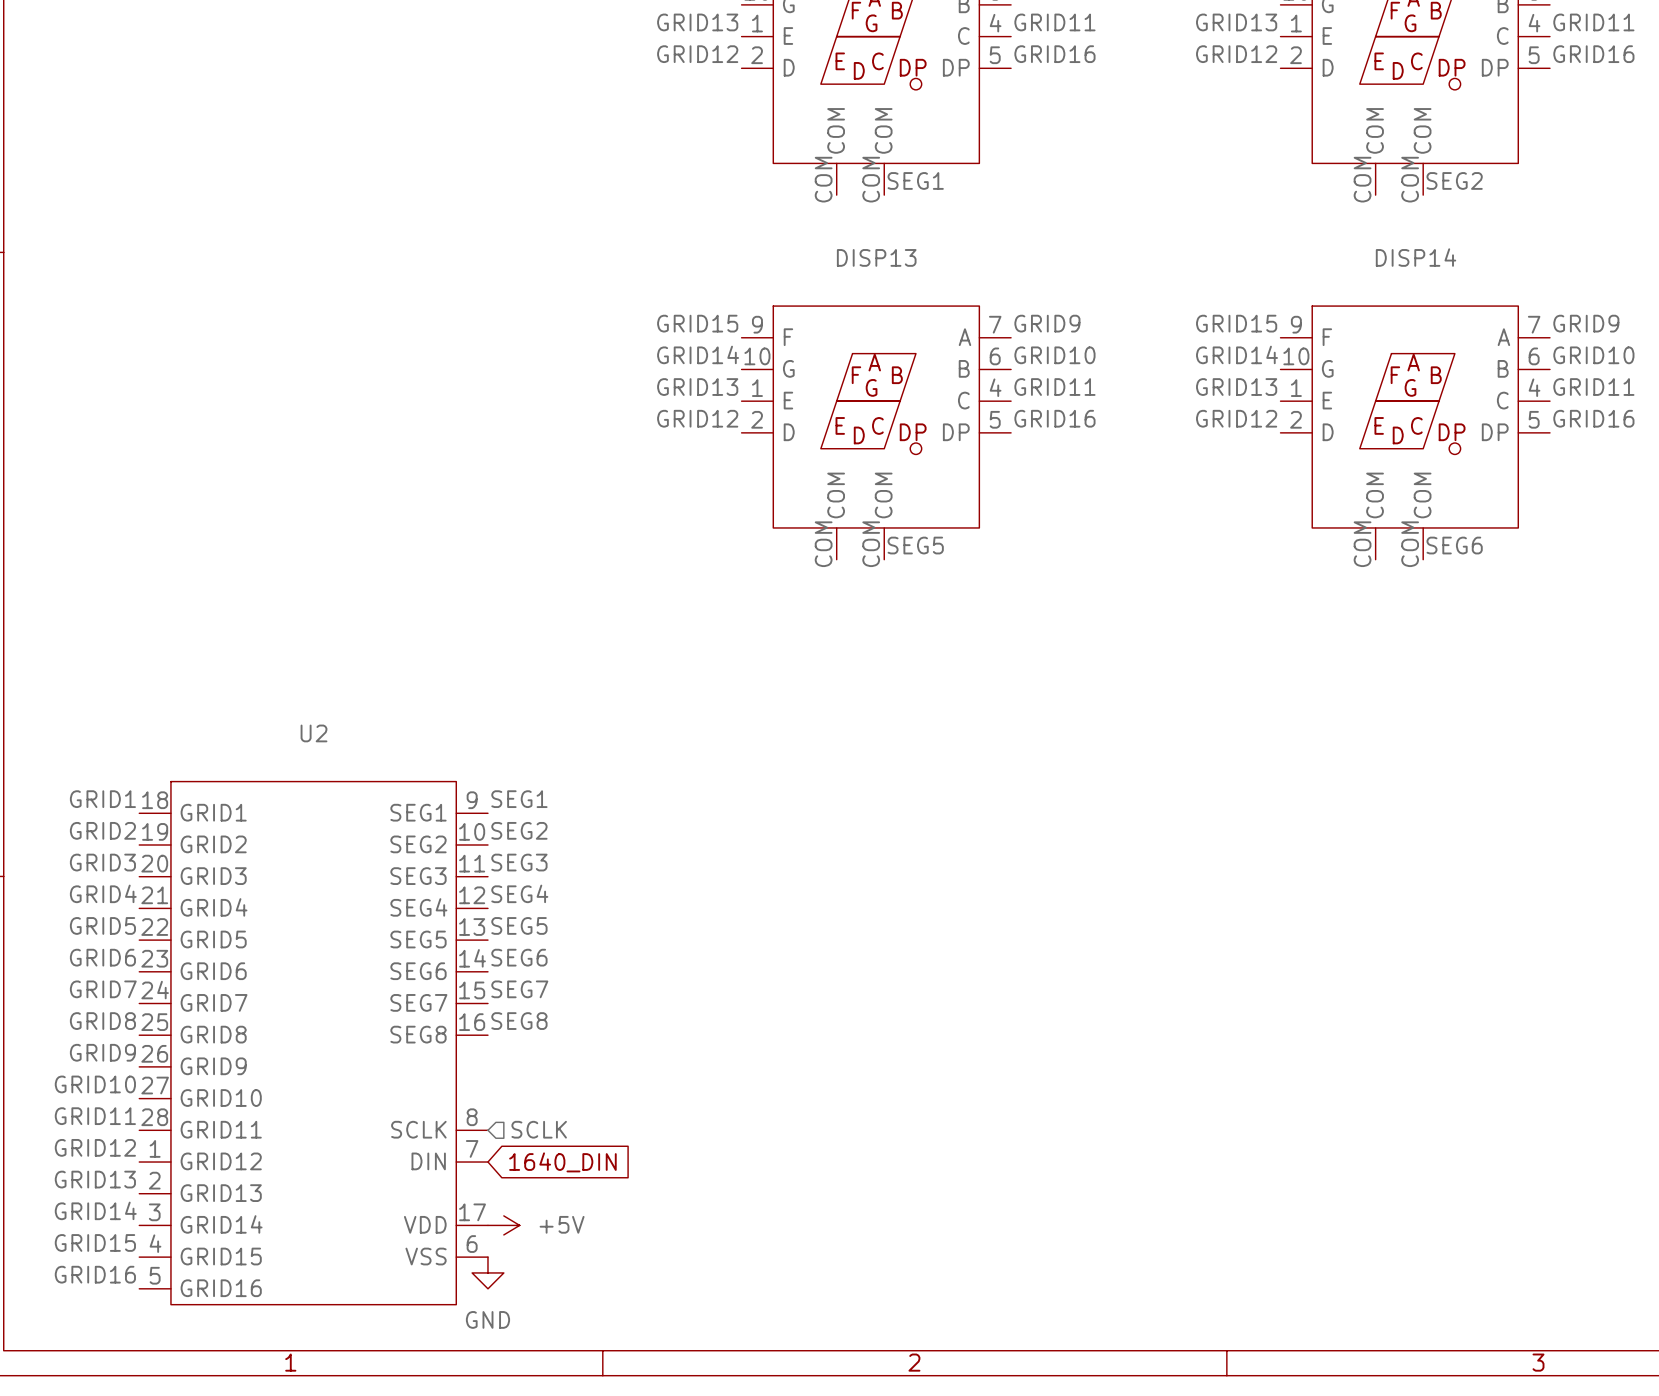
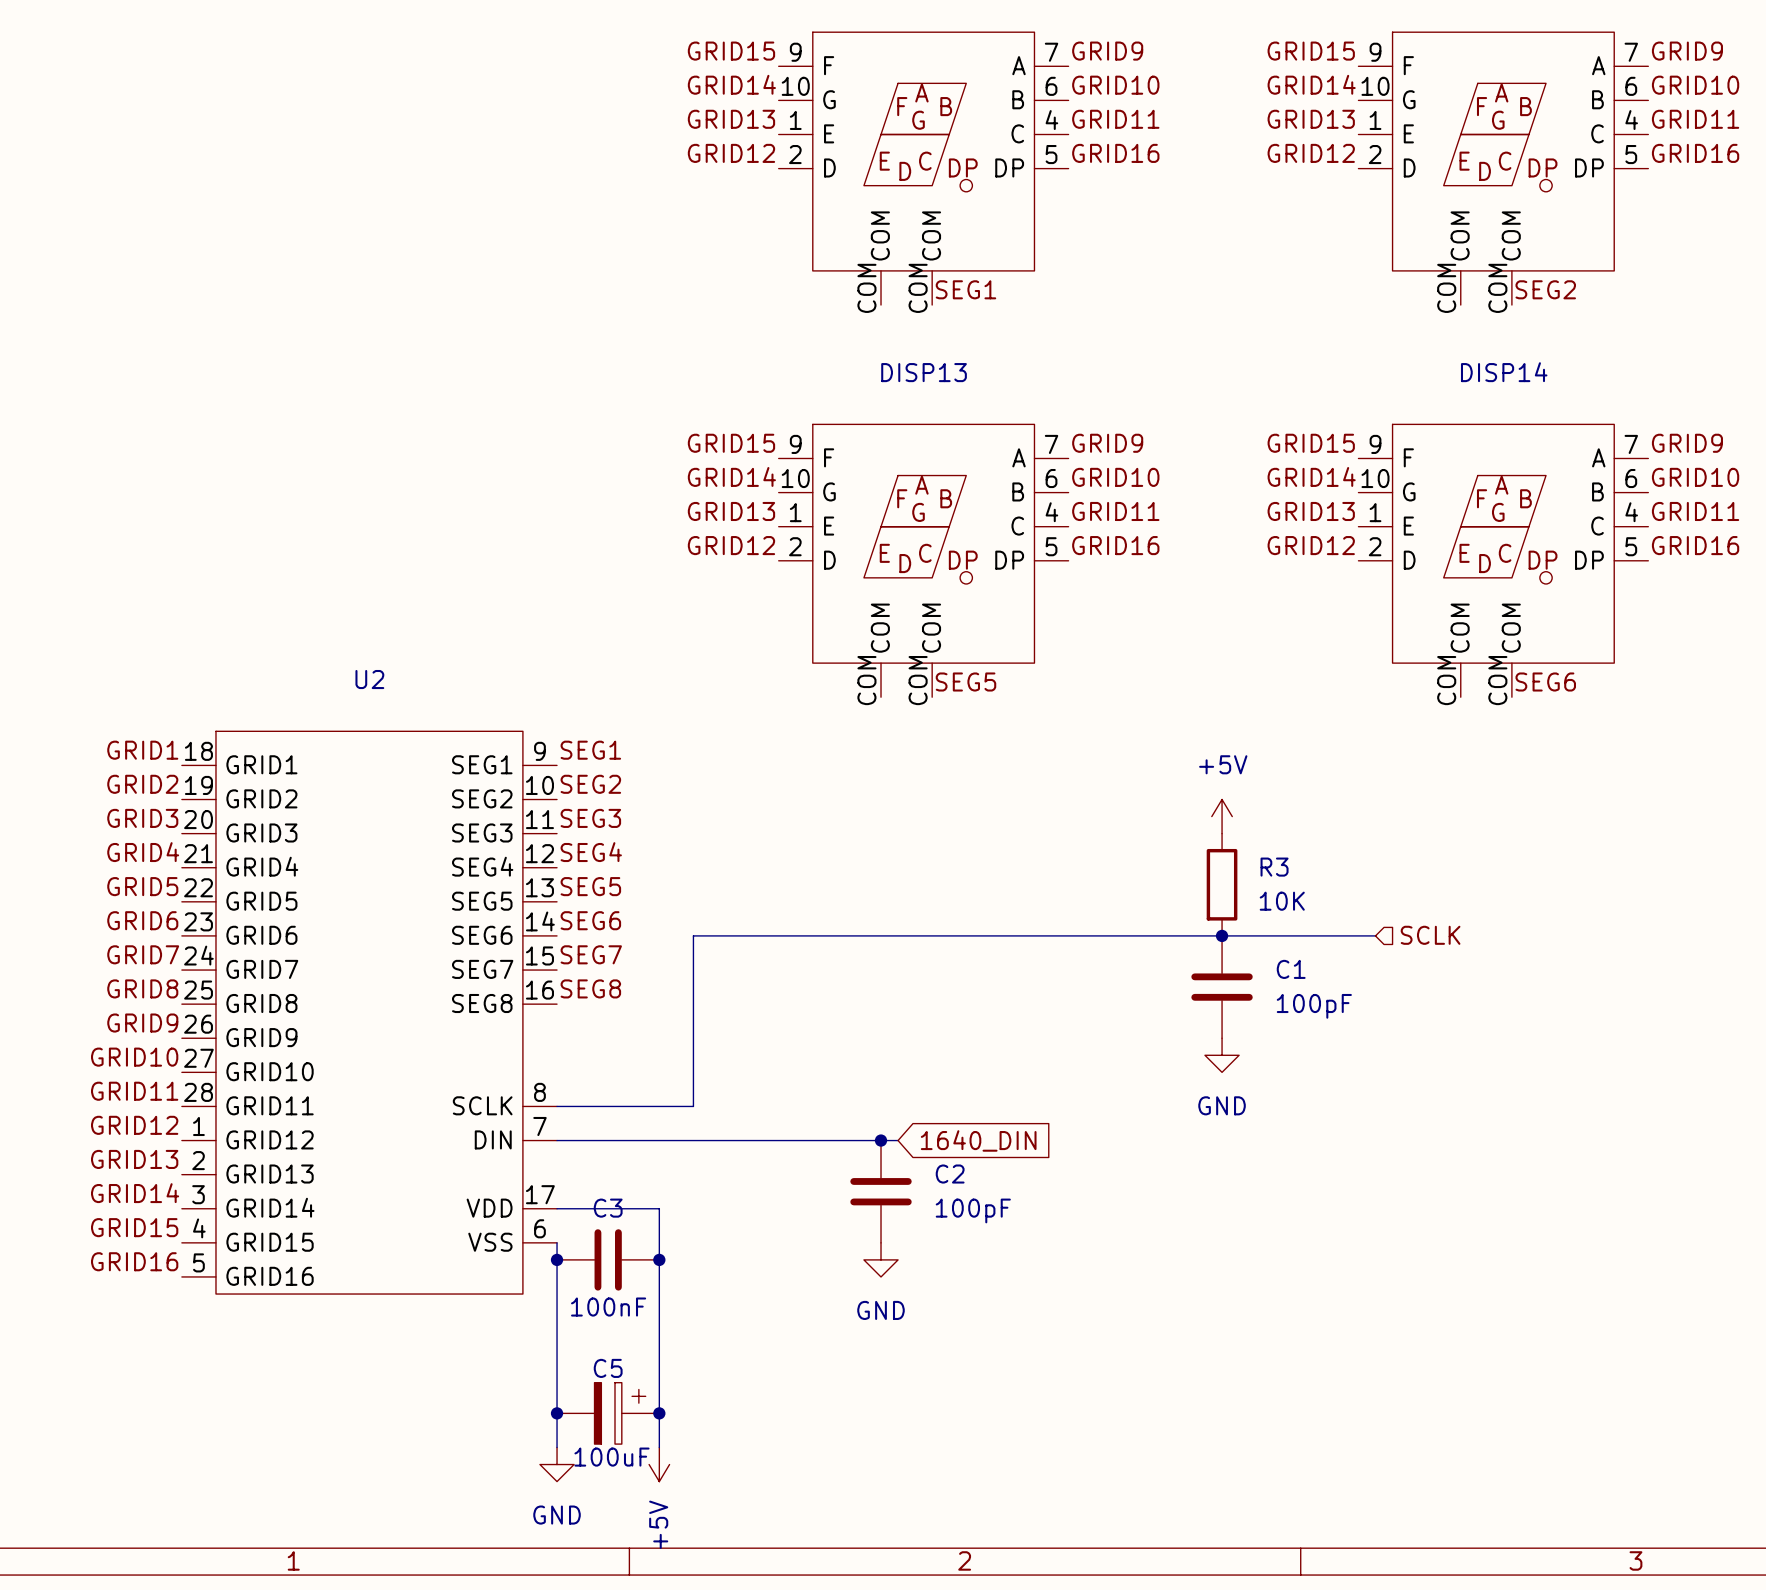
power symbol: none -> +5V (1222, 816)
R3: none -> 10K (1222, 884)
junction: none -> (1222, 935)
wire: none -> (1375, 935) (693, 935) (693, 1106) (557, 1106)
hierarchical label: none -> SCLK (1430, 935)
label position: GRID1 (102, 799) -> GRID1 (142, 750)
label position: SEG1 (519, 799) -> SEG1 (590, 750)
C1: none -> 100pF (1222, 987)
label position: GRID2 (102, 830) -> GRID2 (142, 784)
label position: SEG2 (519, 830) -> SEG2 (590, 784)
label position: GRID3 (102, 862) -> GRID3 (142, 818)
label position: SEG3 (519, 862) -> SEG3 (590, 818)
power symbol: none -> GND (1222, 1055)
label position: GRID4 (103, 893) -> GRID4 (143, 852)
label position: SEG4 (519, 893) -> SEG4 (591, 852)
label position: GRID5 (102, 925) -> GRID5 (142, 886)
label position: SEG5 (519, 925) -> SEG5 (590, 886)
label position: GRID6 (102, 957) -> GRID6 (142, 920)
label position: SEG6 (519, 957) -> SEG6 (590, 920)
wire: none -> (557, 1140) (898, 1140)
junction: none -> (881, 1140)
global label: none -> 1640_DIN (978, 1140)
label position: GRID7 (103, 989) -> GRID7 (143, 954)
label position: SEG7 (519, 989) -> SEG7 (591, 954)
C2: none -> 100pF (881, 1191)
label position: GRID8 (102, 1021) -> GRID8 (142, 988)
label position: SEG8 (519, 1021) -> SEG8 (590, 988)
wire: none -> (557, 1208) (659, 1208) (659, 1447)
U2 position: (313, 1043) -> (369, 1012)
label position: GRID9 (102, 1052) -> GRID9 (142, 1023)
wire: none -> (557, 1242) (557, 1447)
junction: none -> (557, 1259)
C3: none -> 100nF (608, 1259)
junction: none -> (659, 1259)
power symbol: none -> GND (881, 1259)
label position: GRID10 (95, 1084) -> GRID10 (134, 1057)
label position: GRID11 (95, 1116) -> GRID11 (134, 1091)
hierarchical label: SCLK (539, 1129) -> none
label position: GRID12 (95, 1147) -> GRID12 (134, 1125)
global label: 1640_DIN (562, 1162) -> none
label position: GRID13 (95, 1179) -> GRID13 (134, 1159)
label position: GRID14 (95, 1210) -> GRID14 (135, 1193)
power symbol rotation: 0° (503, 1225) -> 90° clockwise (659, 1464)
power symbol position: +5V (503, 1225) -> +5V (659, 1464)
junction: none -> (557, 1413)
C5: none -> 100uF (608, 1413)
junction: none -> (659, 1413)
label position: GRID15 (95, 1242) -> GRID15 (134, 1227)
power symbol position: GND (487, 1272) -> GND (557, 1464)
label position: GRID16 (95, 1274) -> GRID16 (134, 1261)

